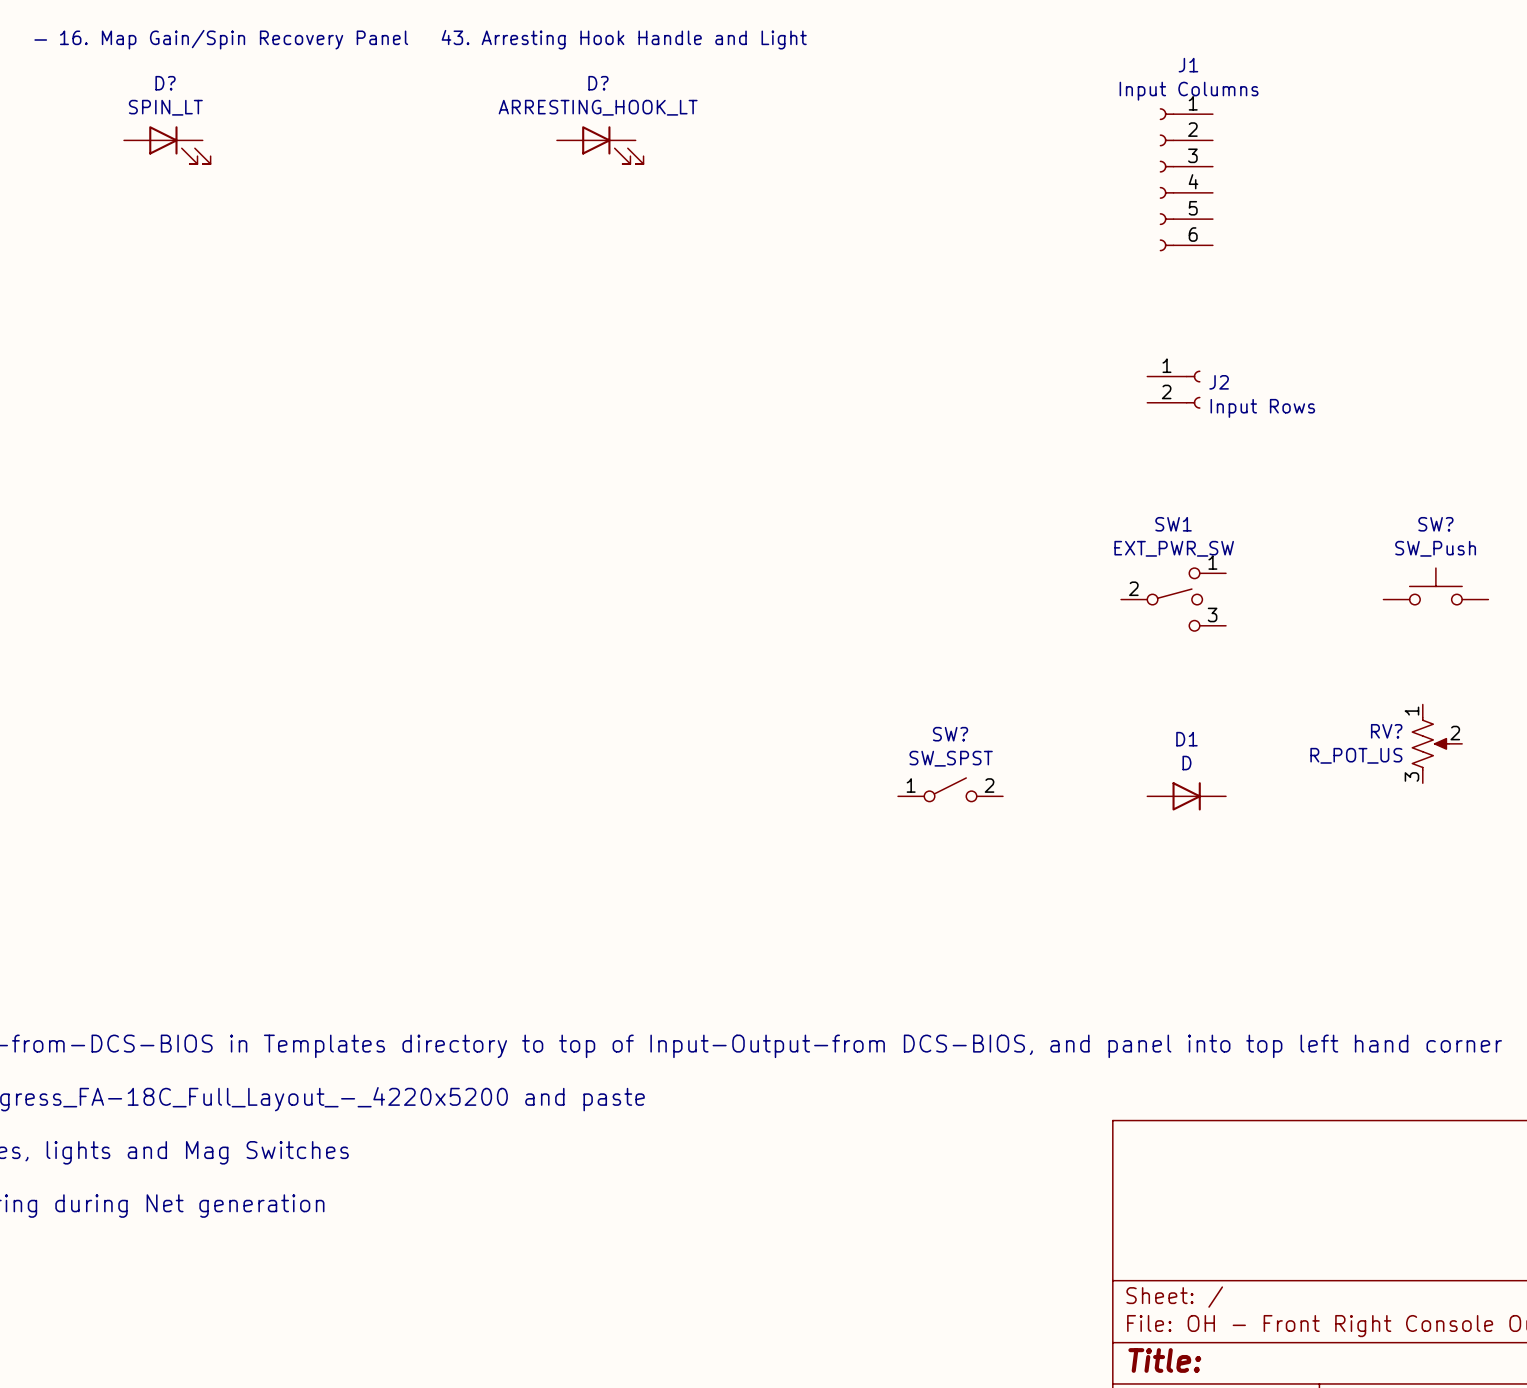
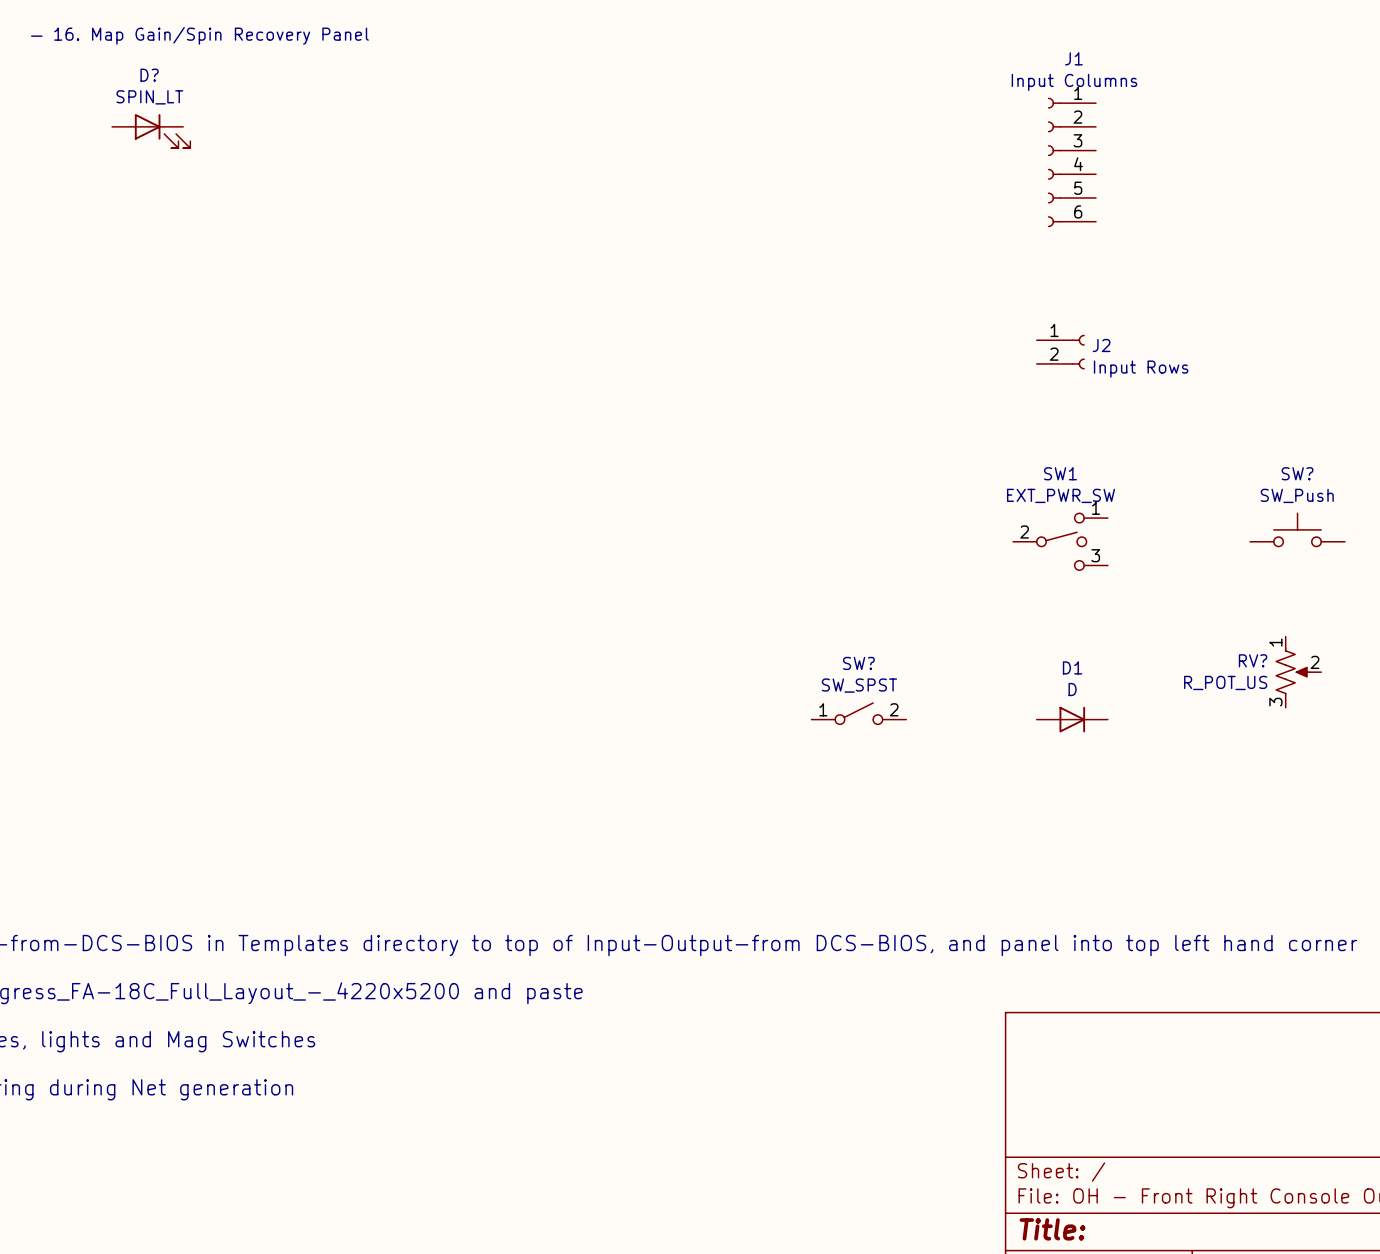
text: 43. Arresting Hook Handle and Light (624, 39) -> none
D?: ARRESTING_HOOK_LT (600, 145) -> none

